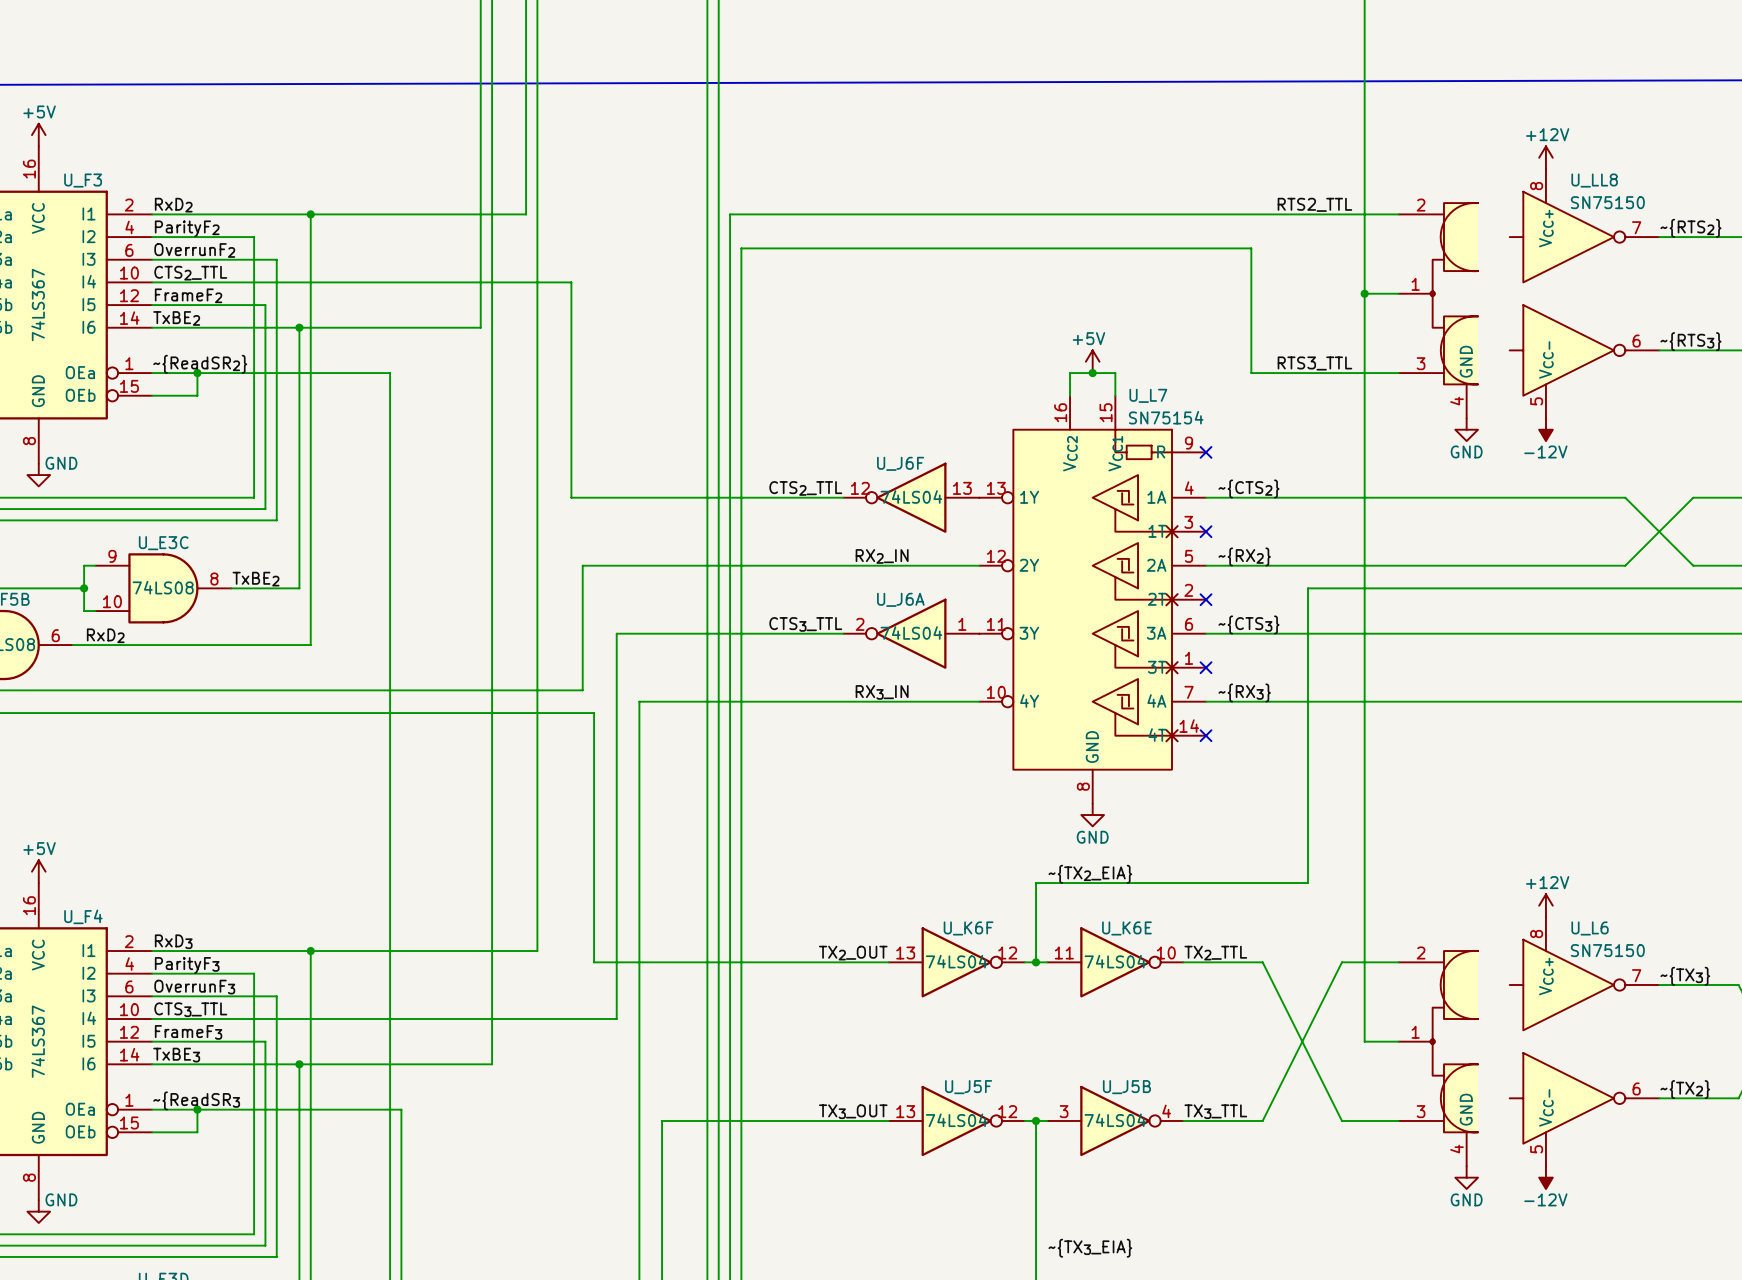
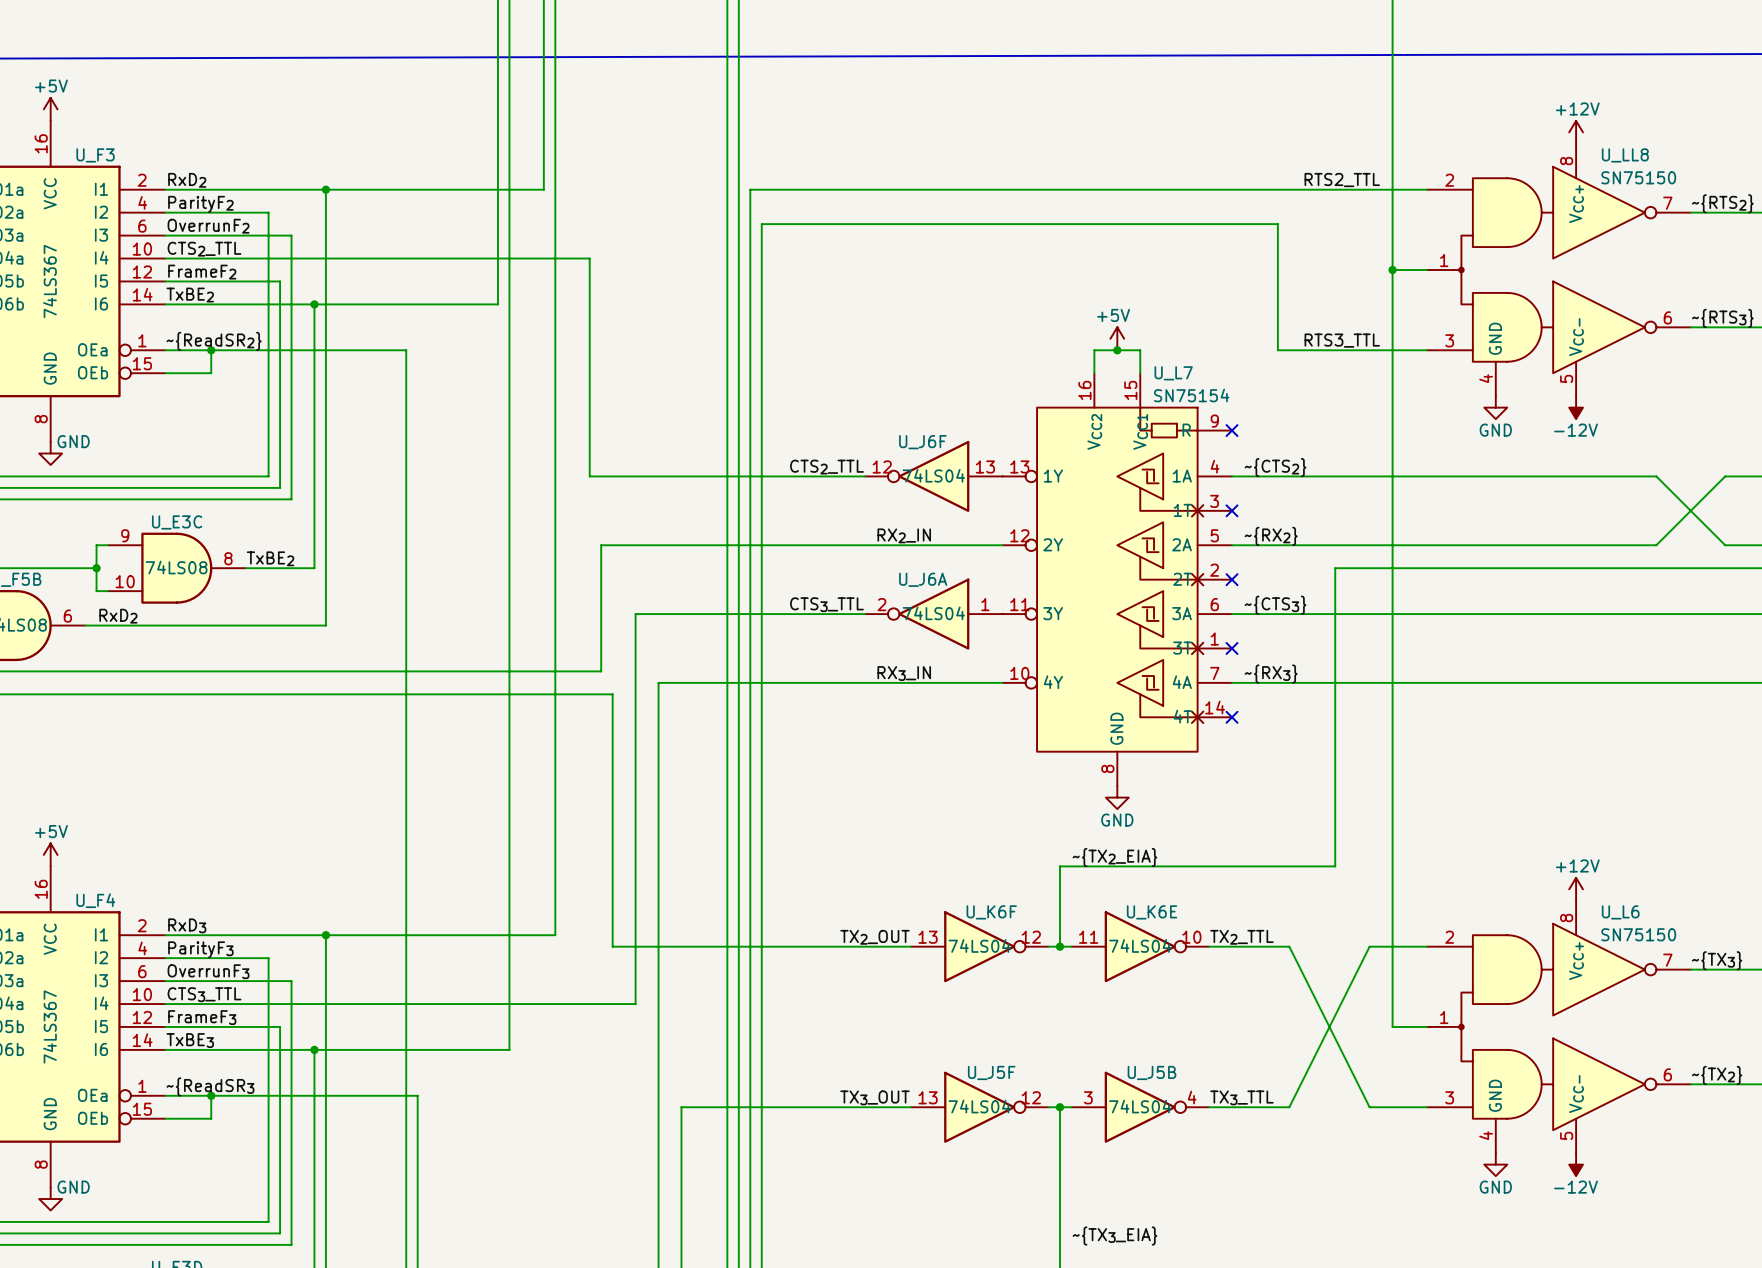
U_LL8 symbol: [1398, 169, 1660, 419] -> [1426, 143, 1691, 397]
U_L6 symbol: [1398, 917, 1660, 1167] -> [1426, 900, 1691, 1154]

